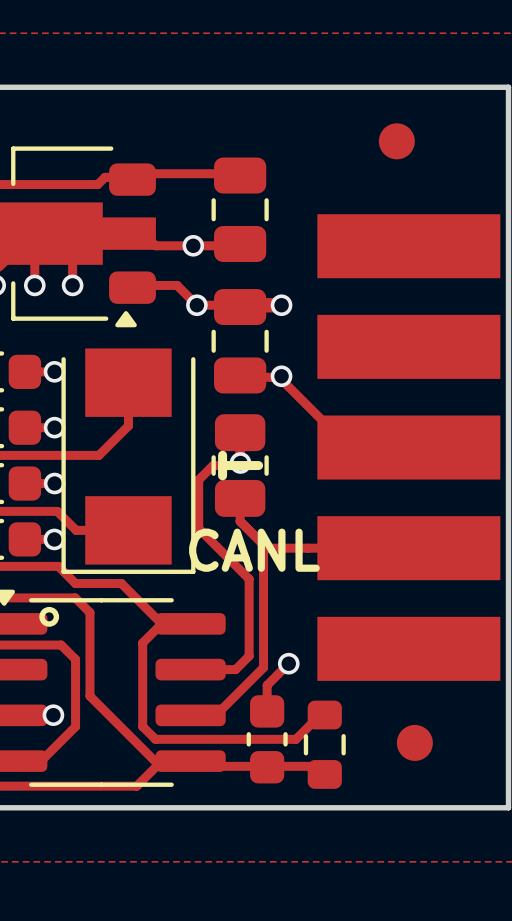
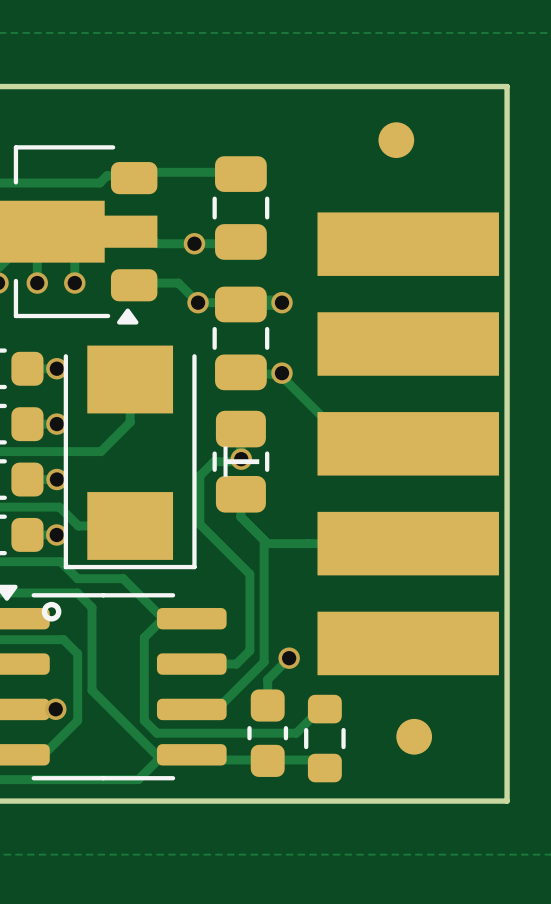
text: CANL (254, 550) -> none

